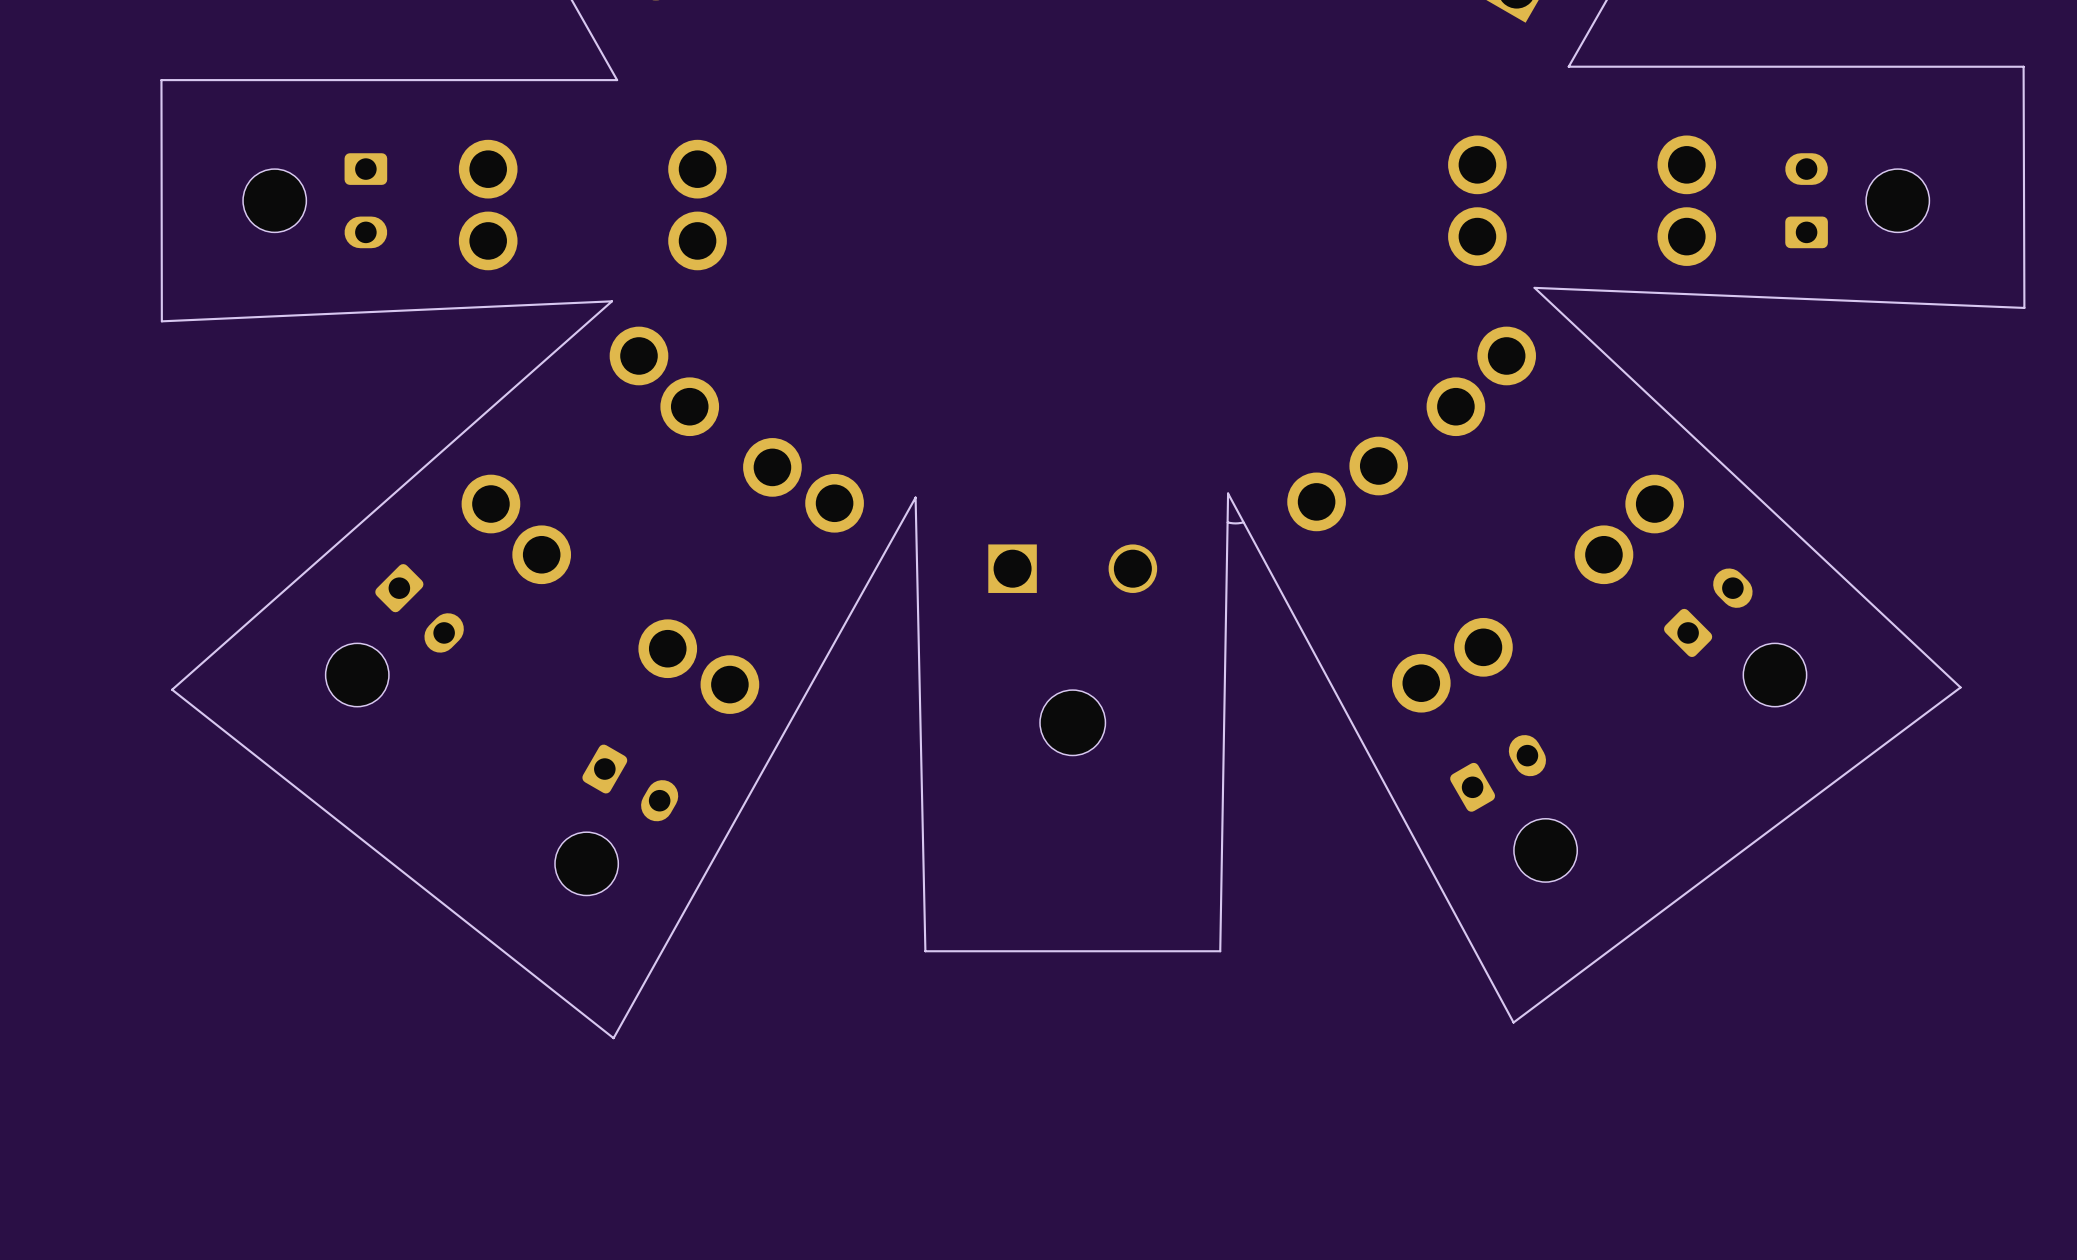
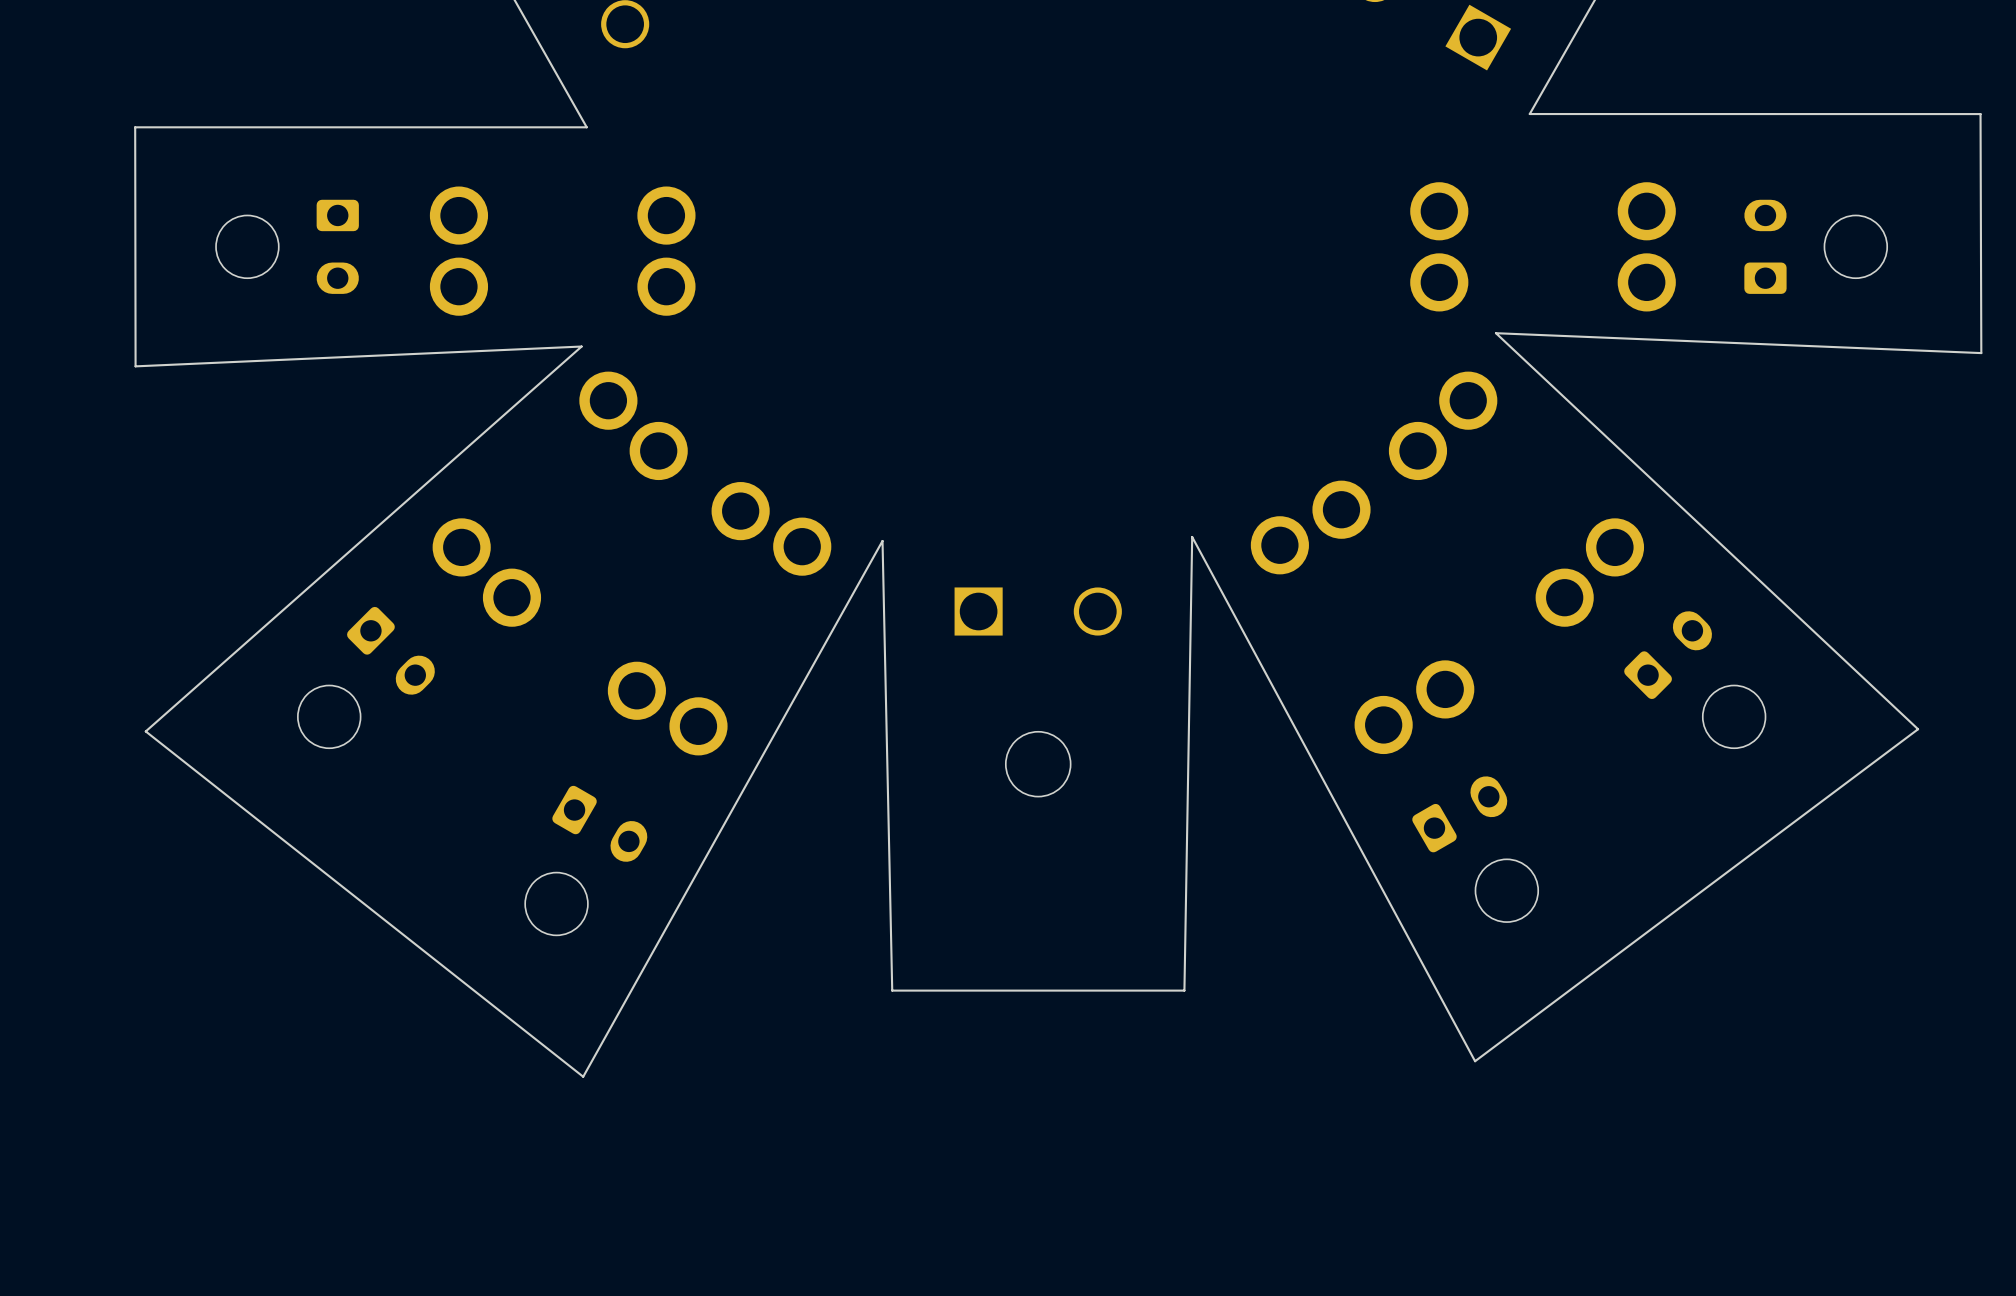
board edge: (1243, 522) (1227, 522) -> none

